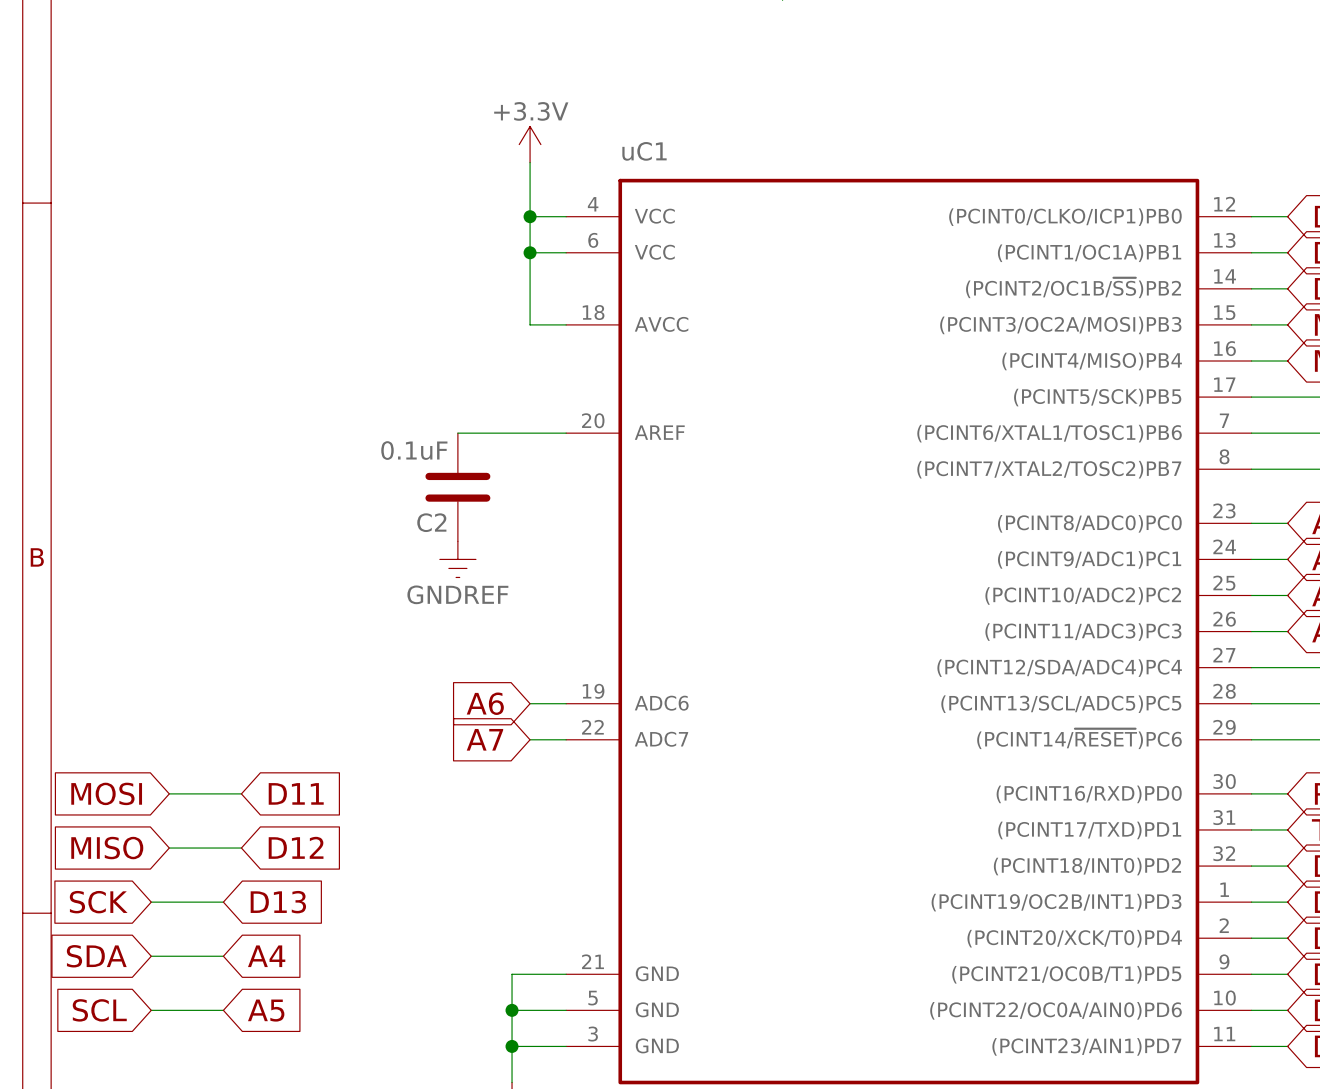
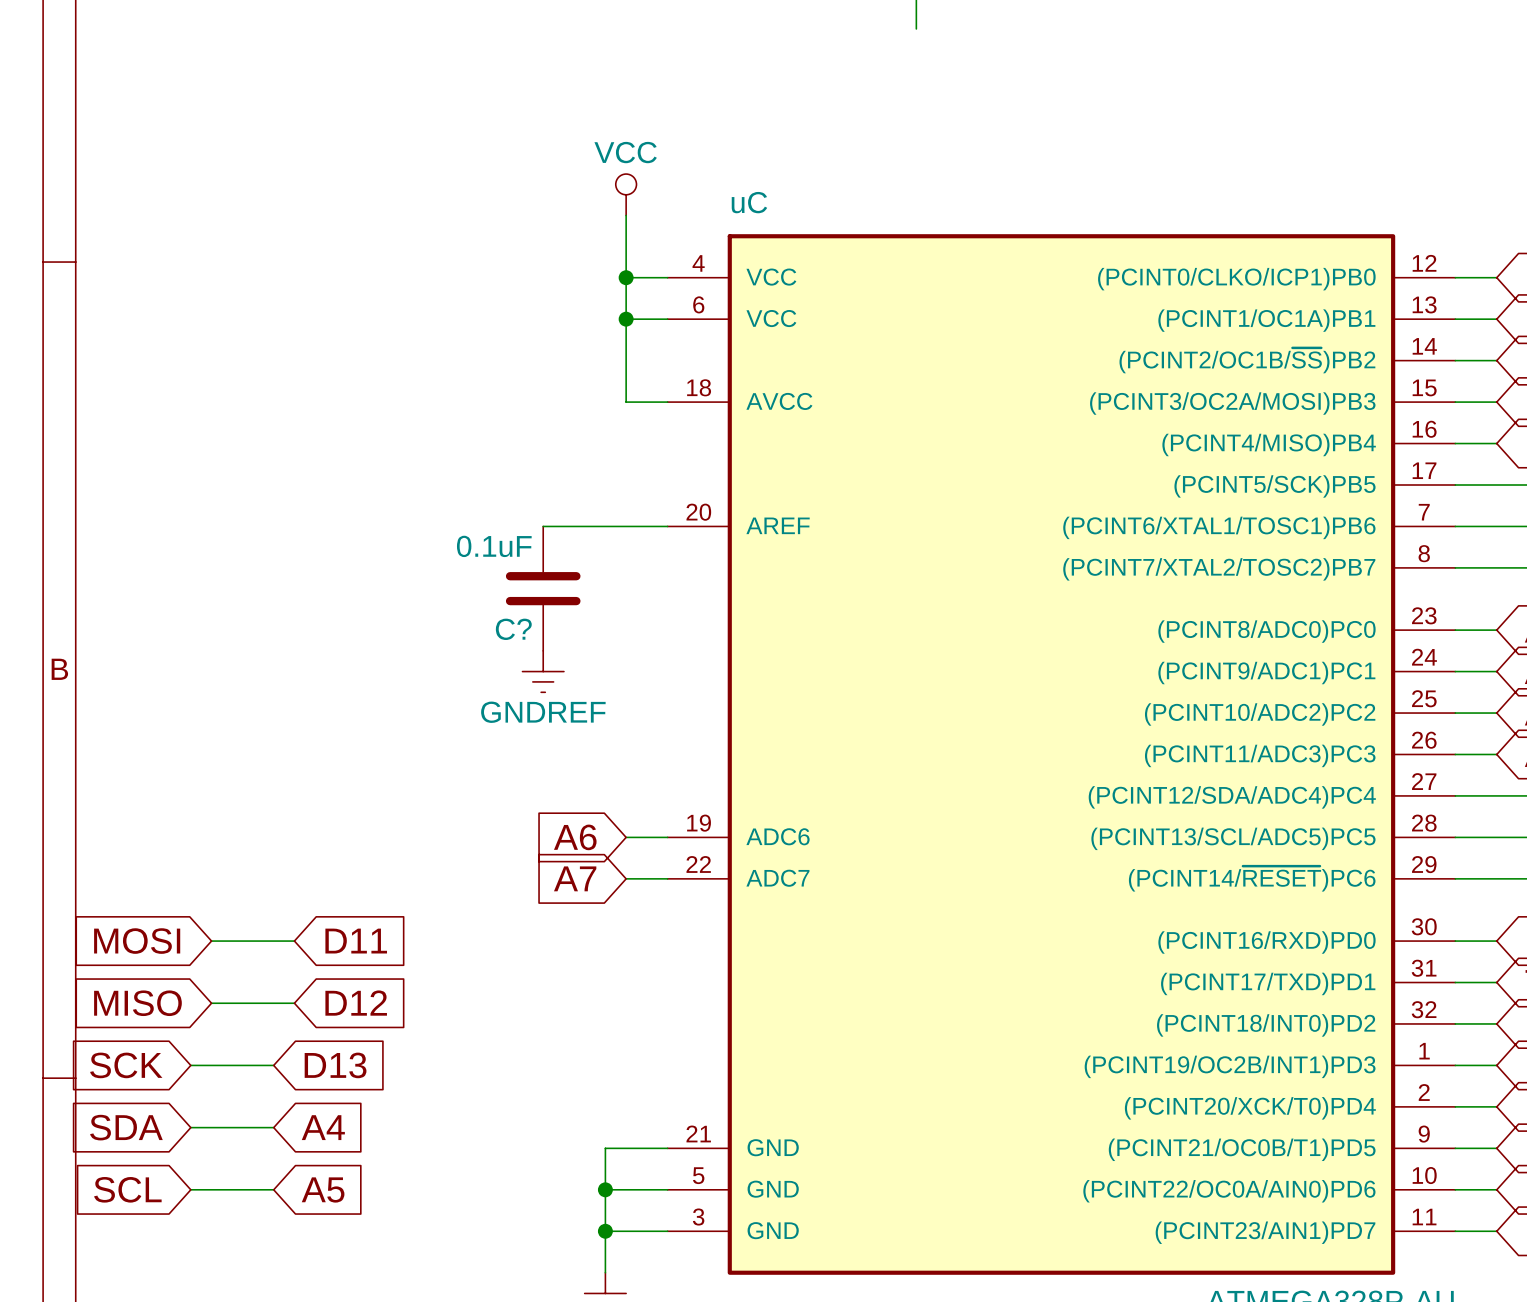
power symbol: +3.3V (530, 144) -> VCC (626, 194)
uC1 name: uC1 (644, 151) -> uC (749, 202)
C2 name: C2 (431, 522) -> C? (513, 629)

